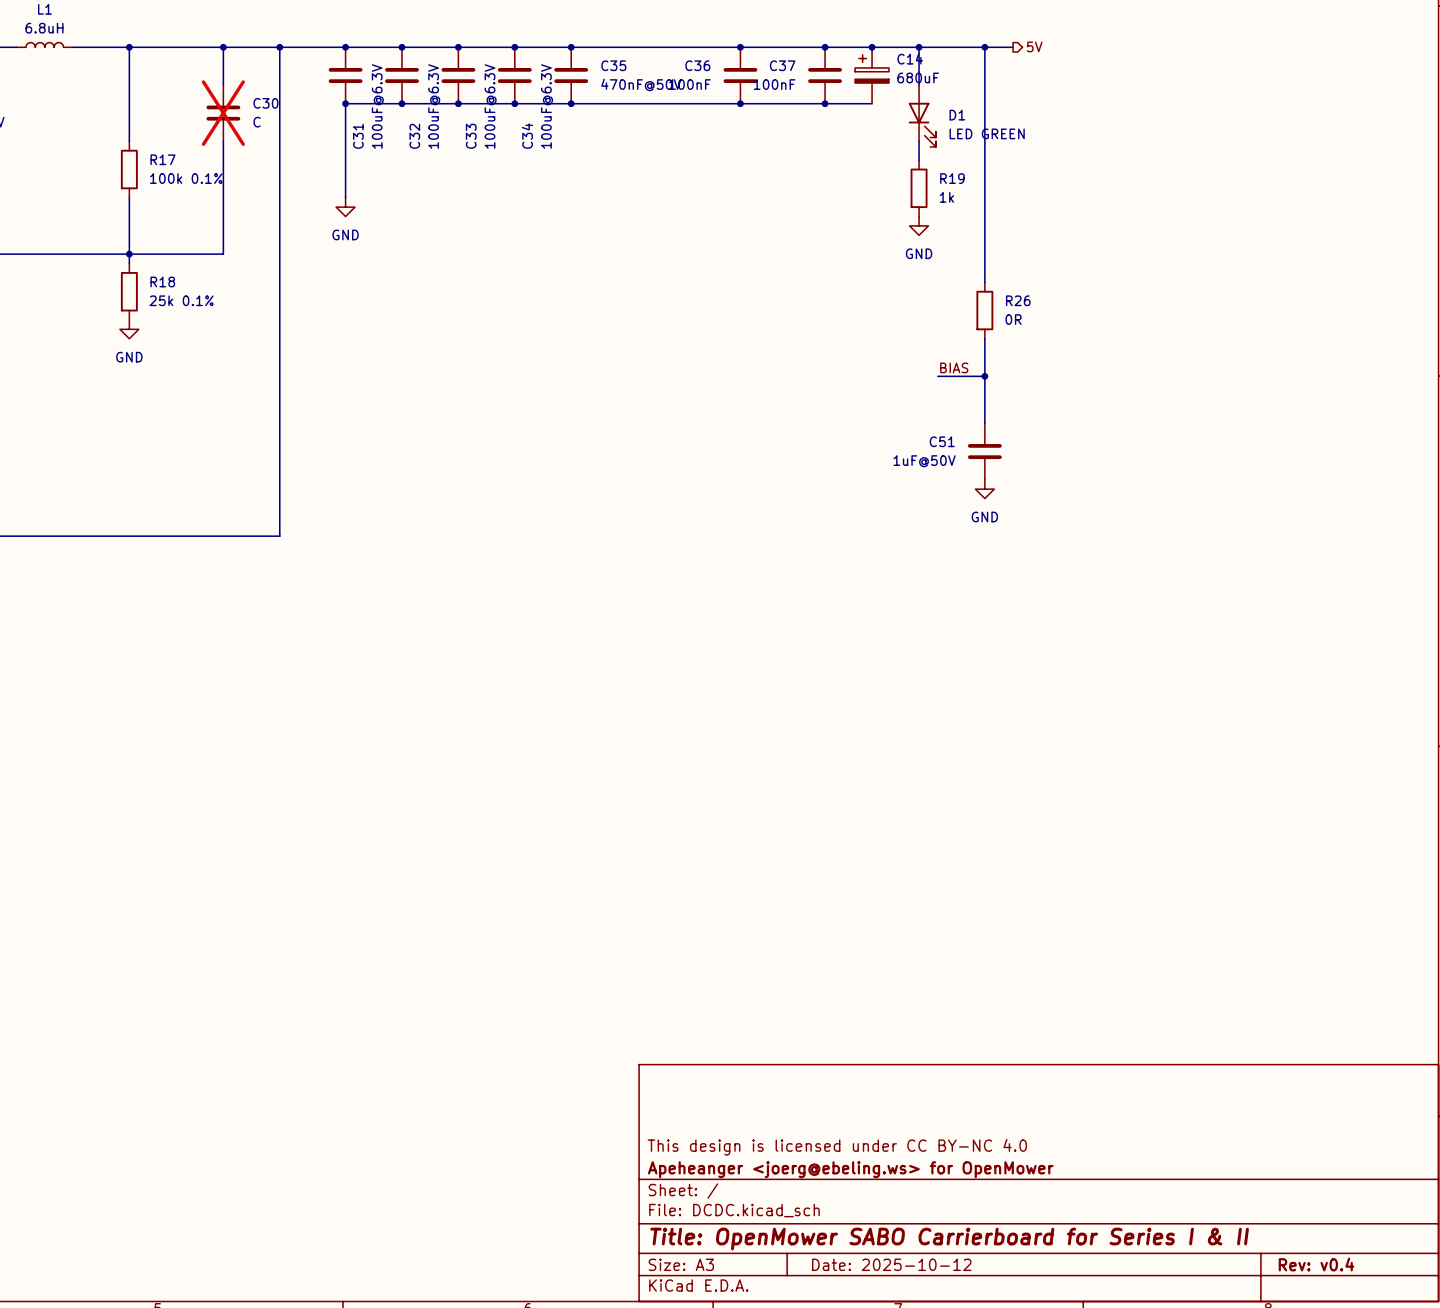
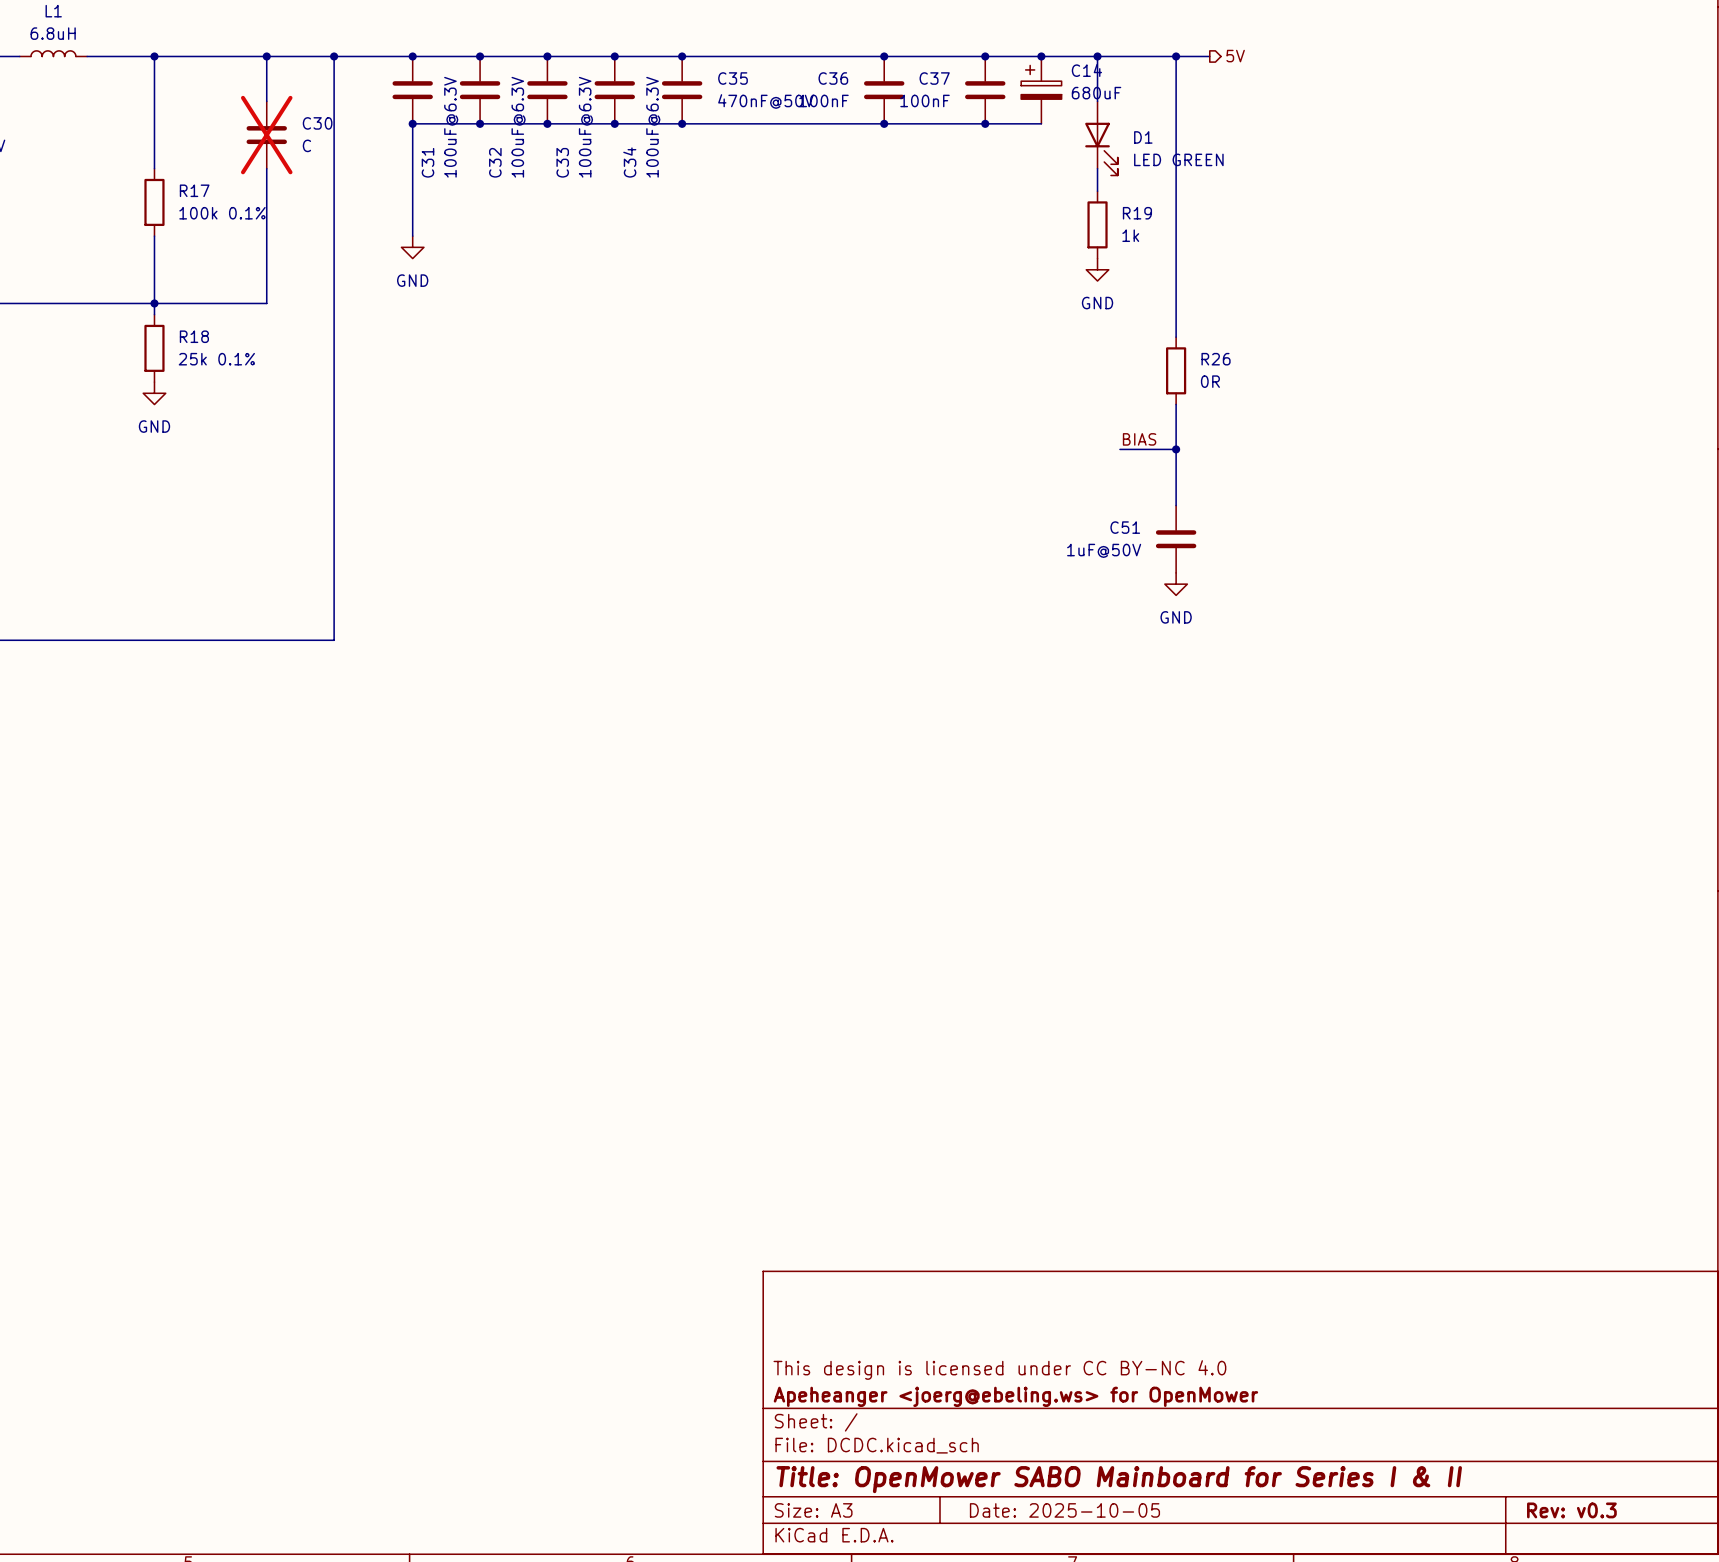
title block: Title: OpenMower SABO Carrierboard for Series I & II (949, 1239) -> Title: OpenMower SABO Mainboard for Series I & II (1119, 1479)
title block: Date: 2025-10-12 (891, 1264) -> Date: 2025-10-05 (1064, 1510)
title block: Rev: v0.4 (1316, 1264) -> Rev: v0.3 (1571, 1510)

